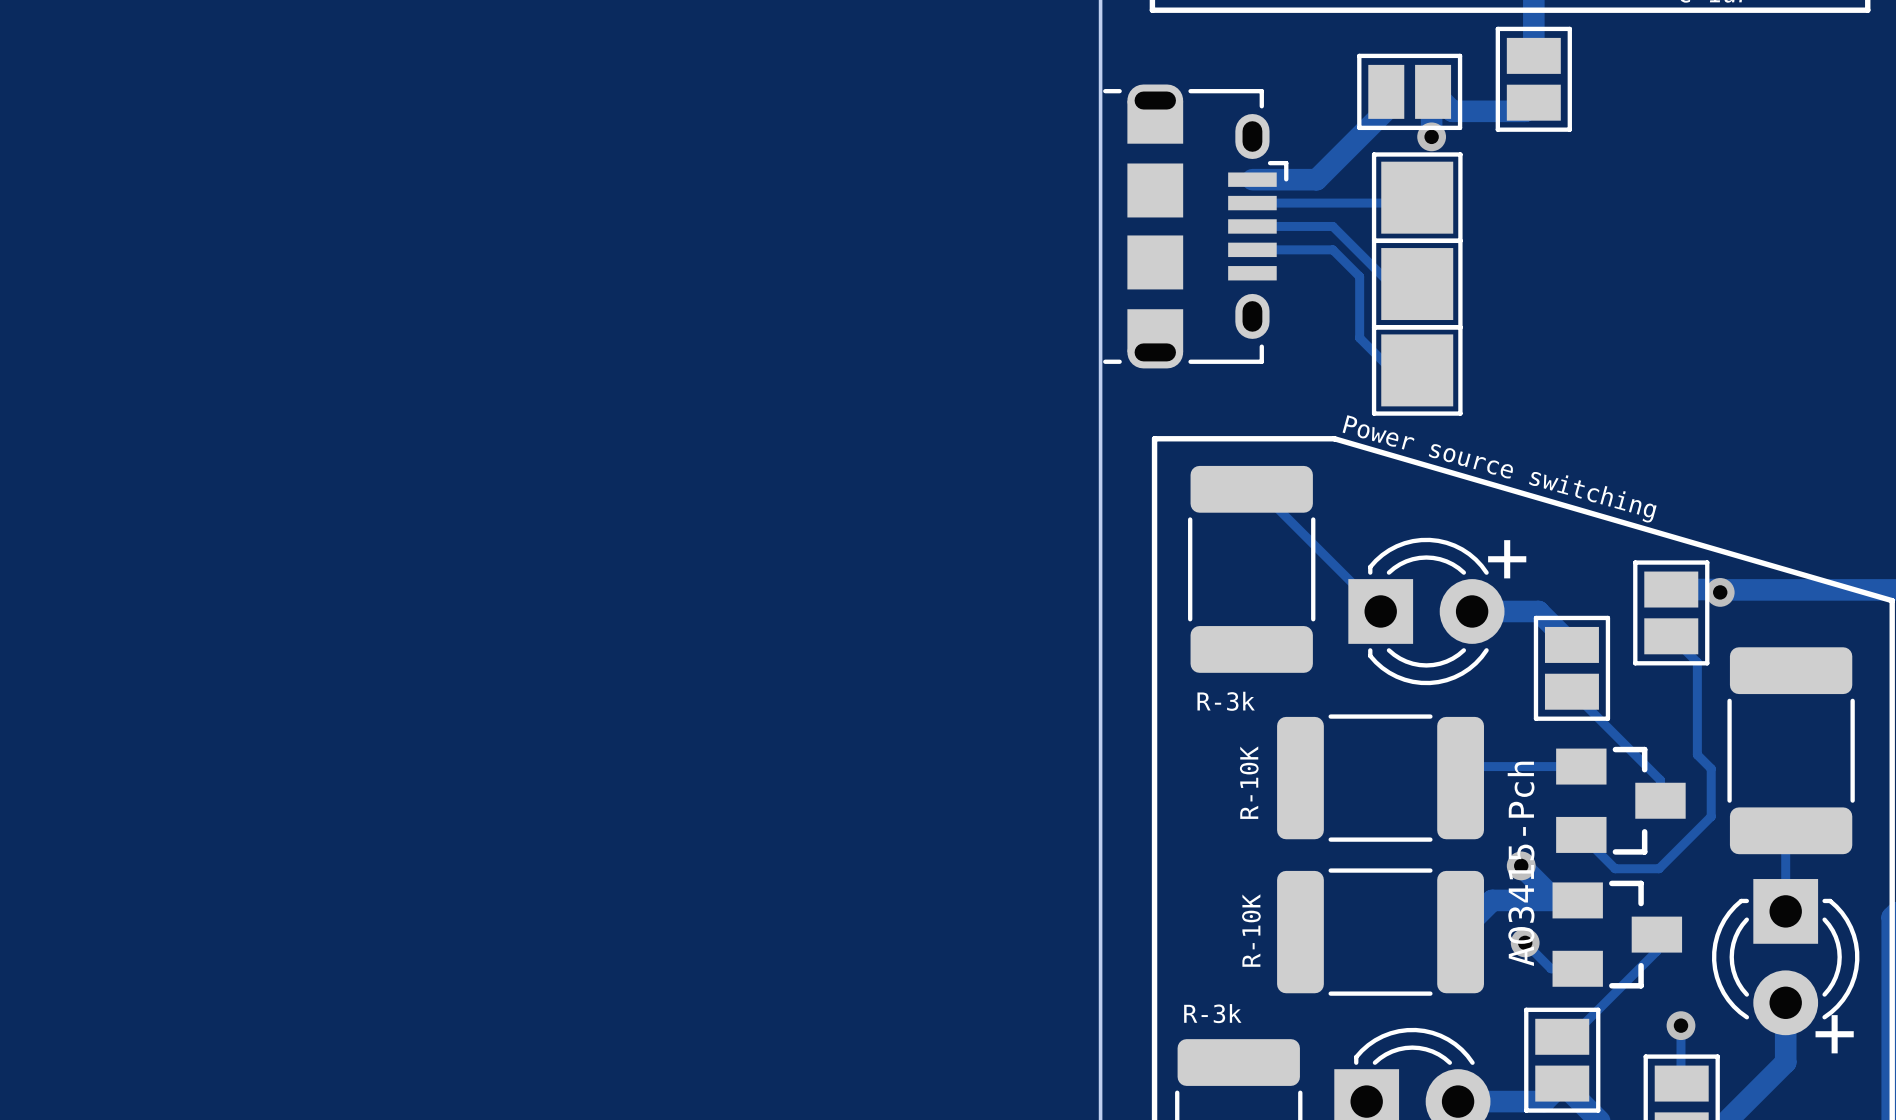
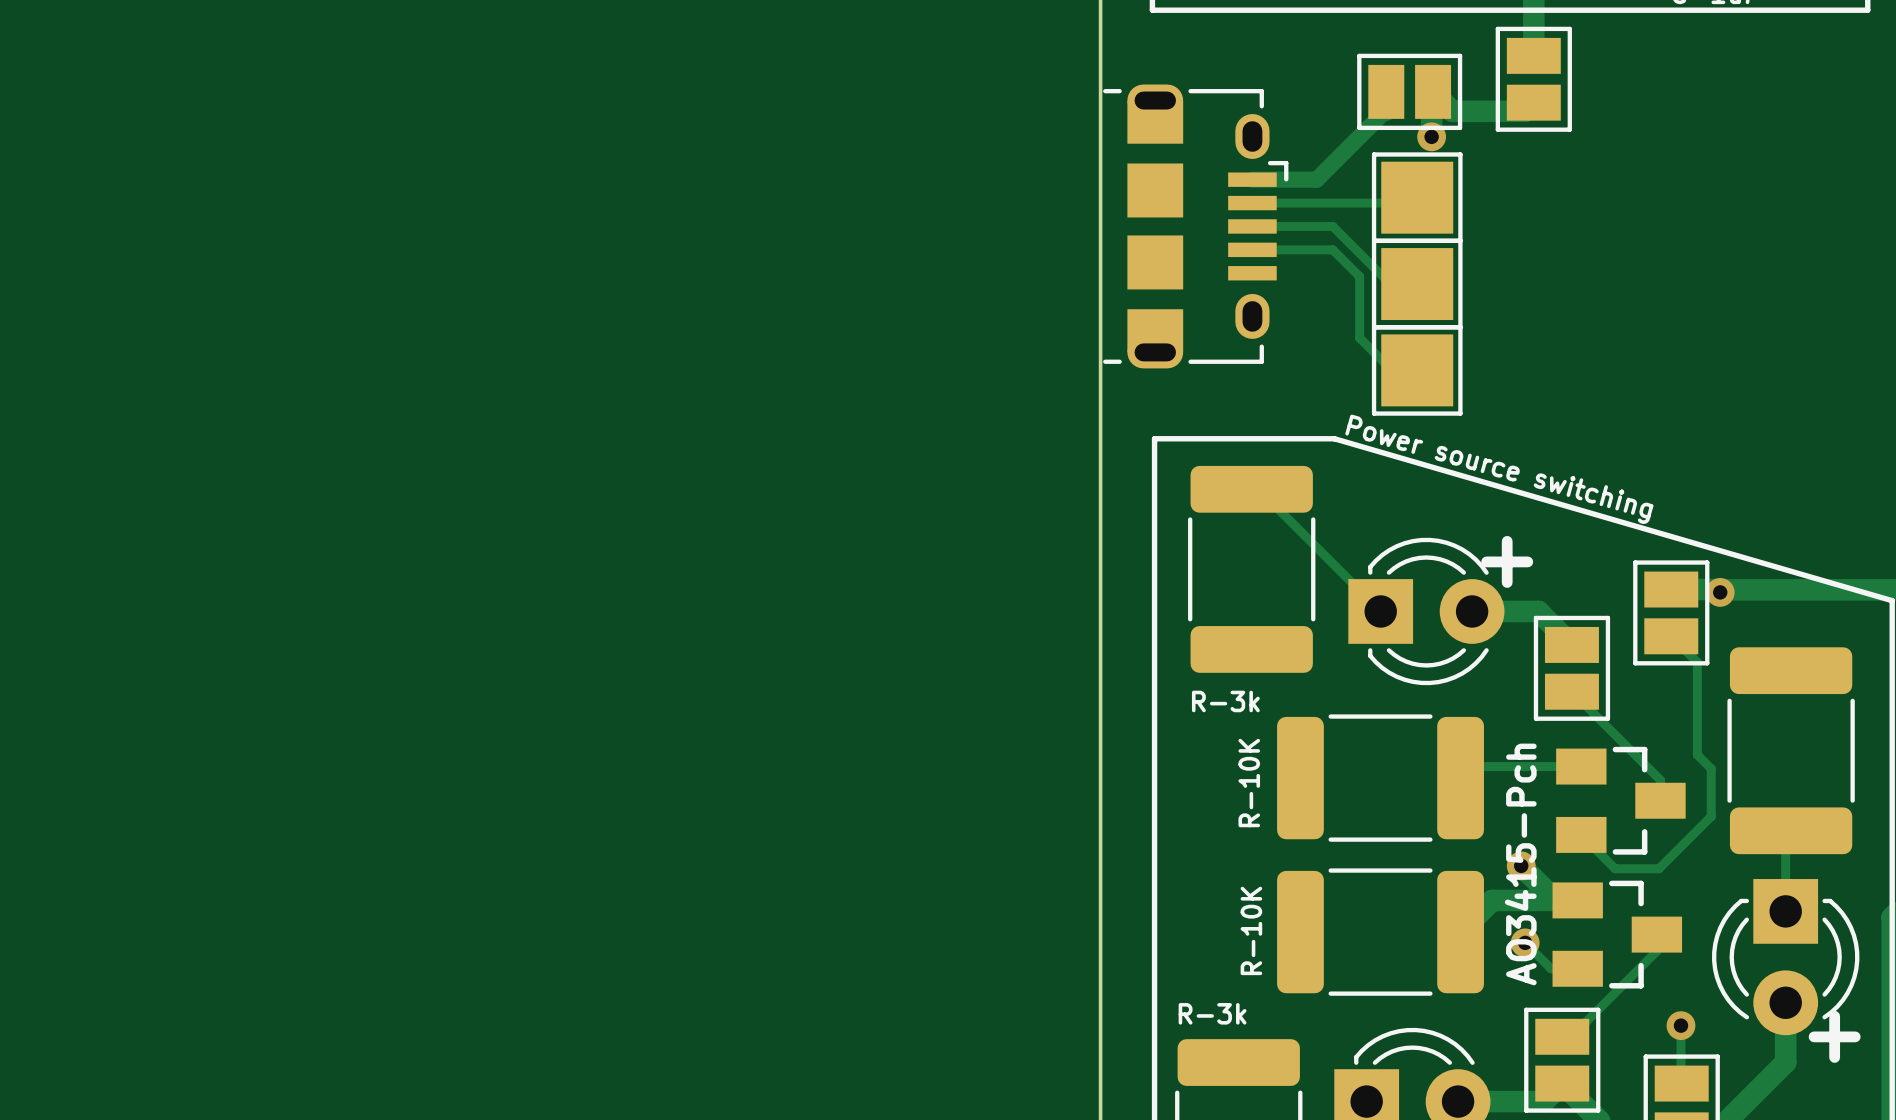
track width: thick (1386, 110) (1316, 179) (1252, 179) -> thin (1386, 110) (1316, 179) (1252, 179)

